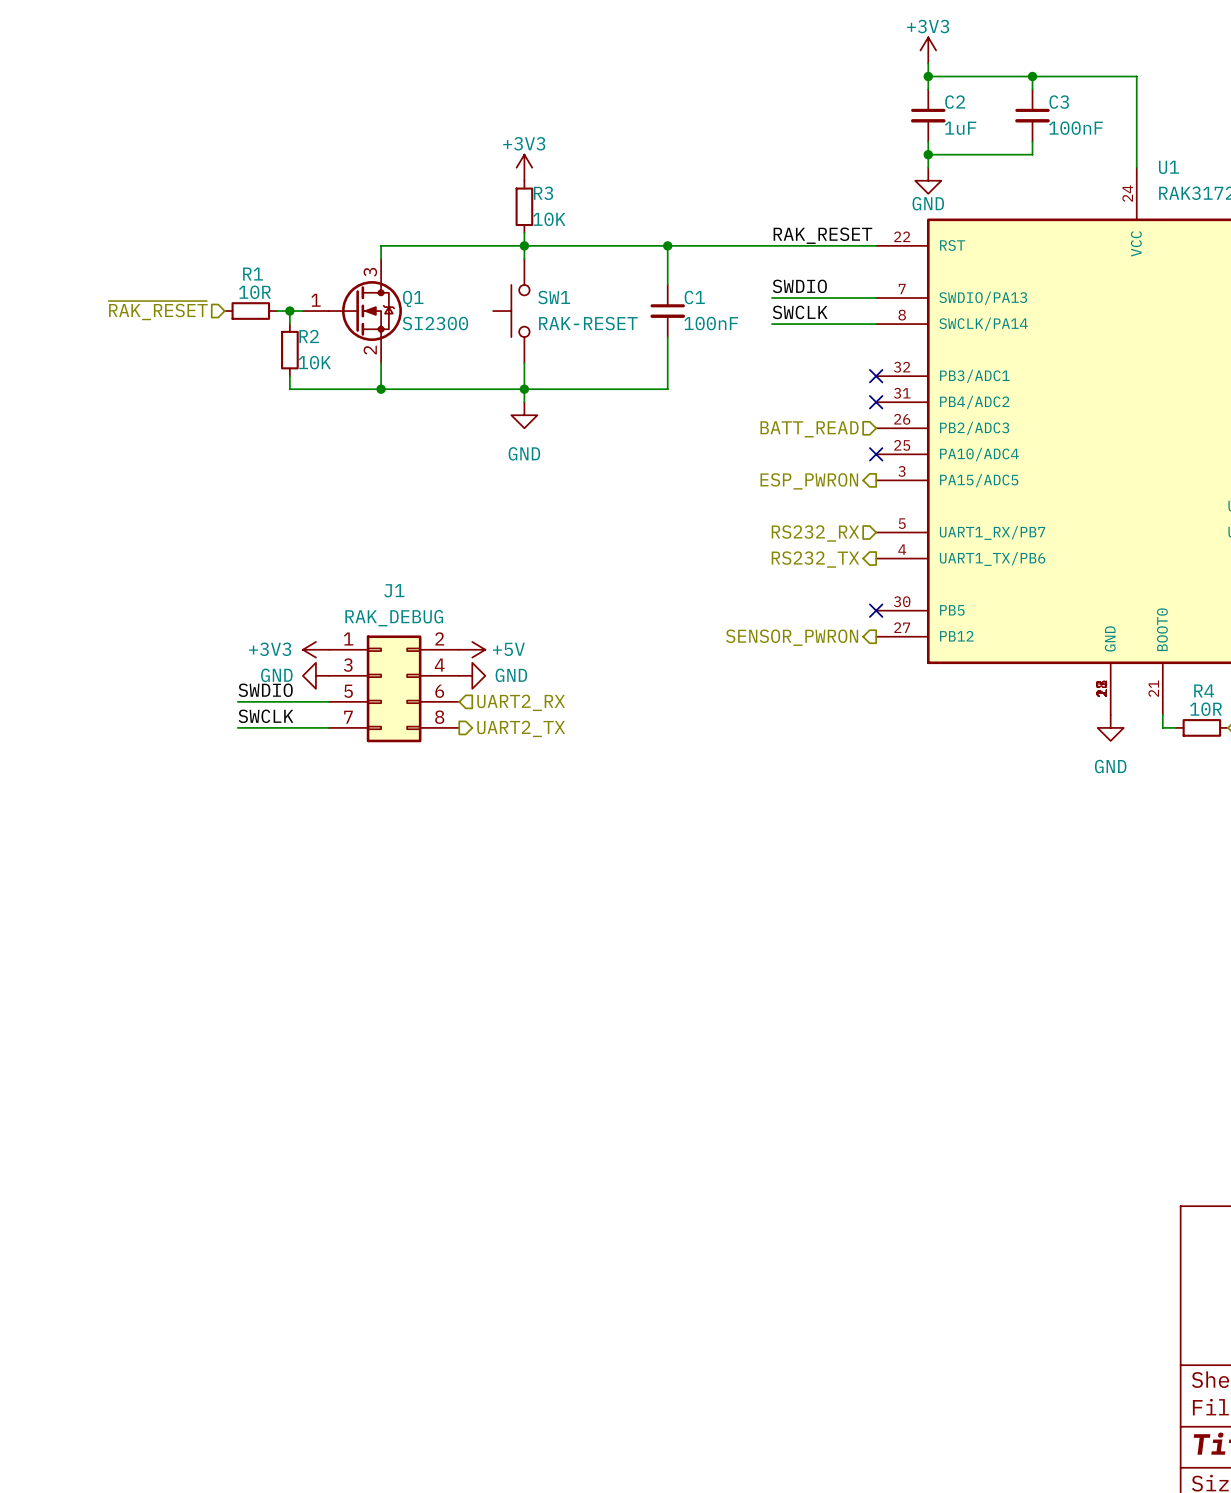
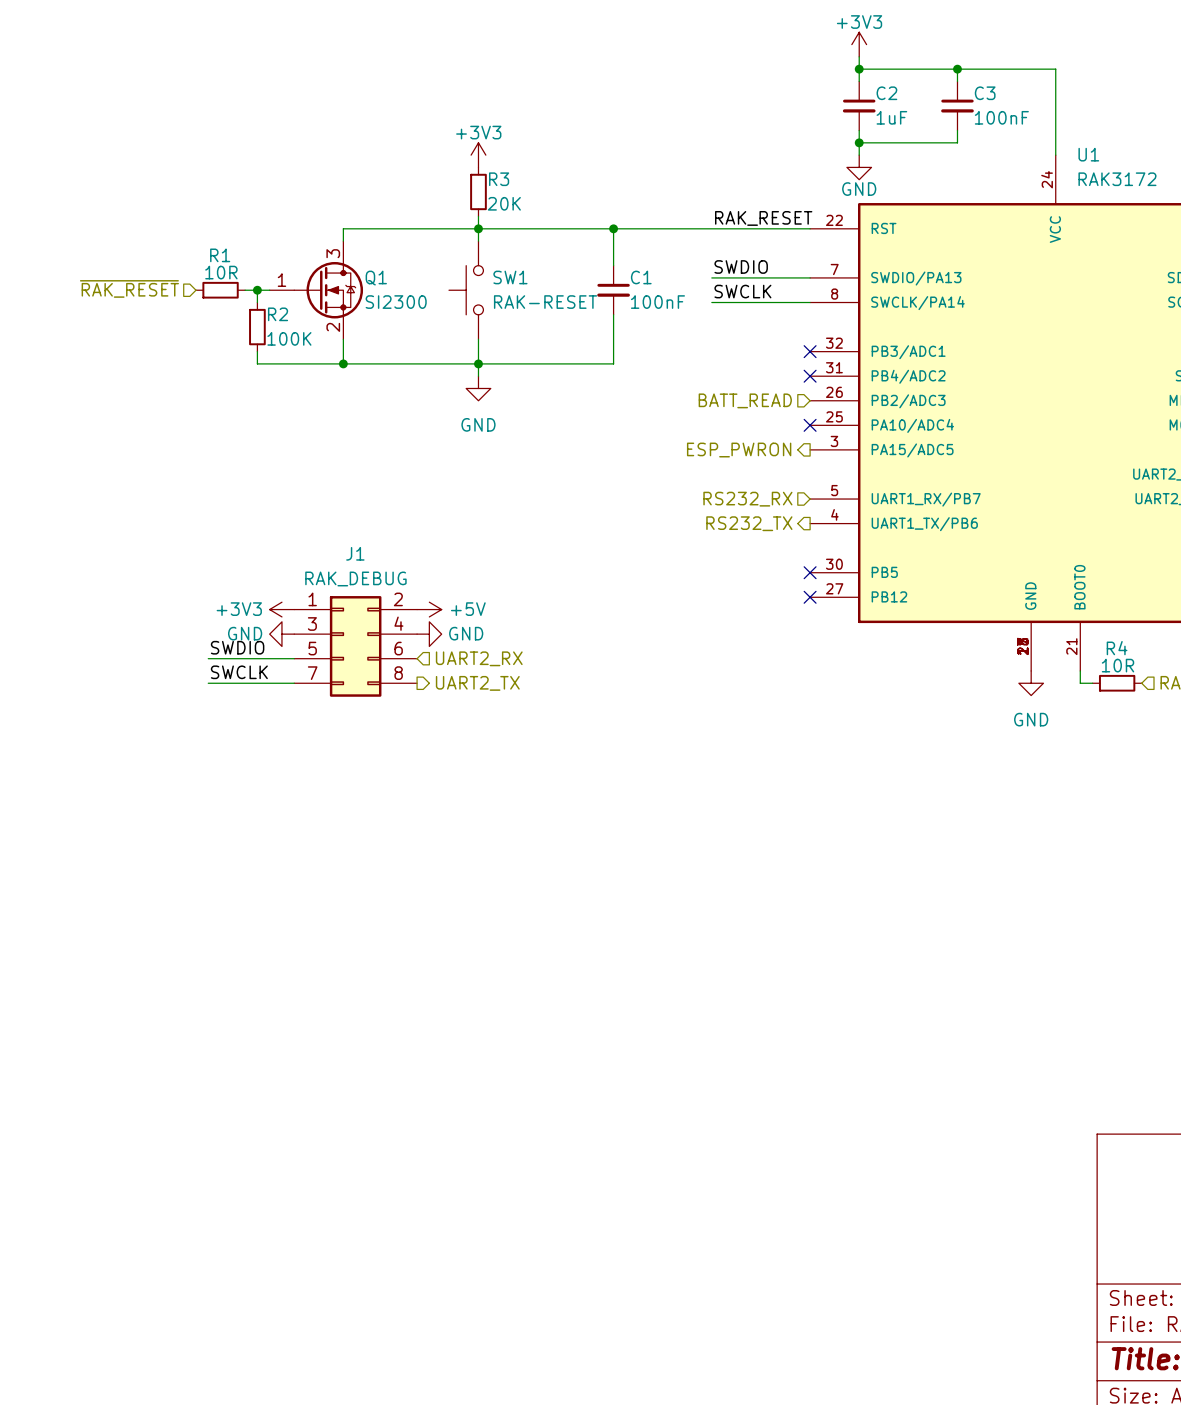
R3 value: 10K (549, 219) -> 20K (504, 203)
R2 value: 10K (314, 362) -> 100K (289, 338)
no-connect mark: none -> (810, 597)
hierarchical label: SENSOR_PWRON (792, 637) -> none

